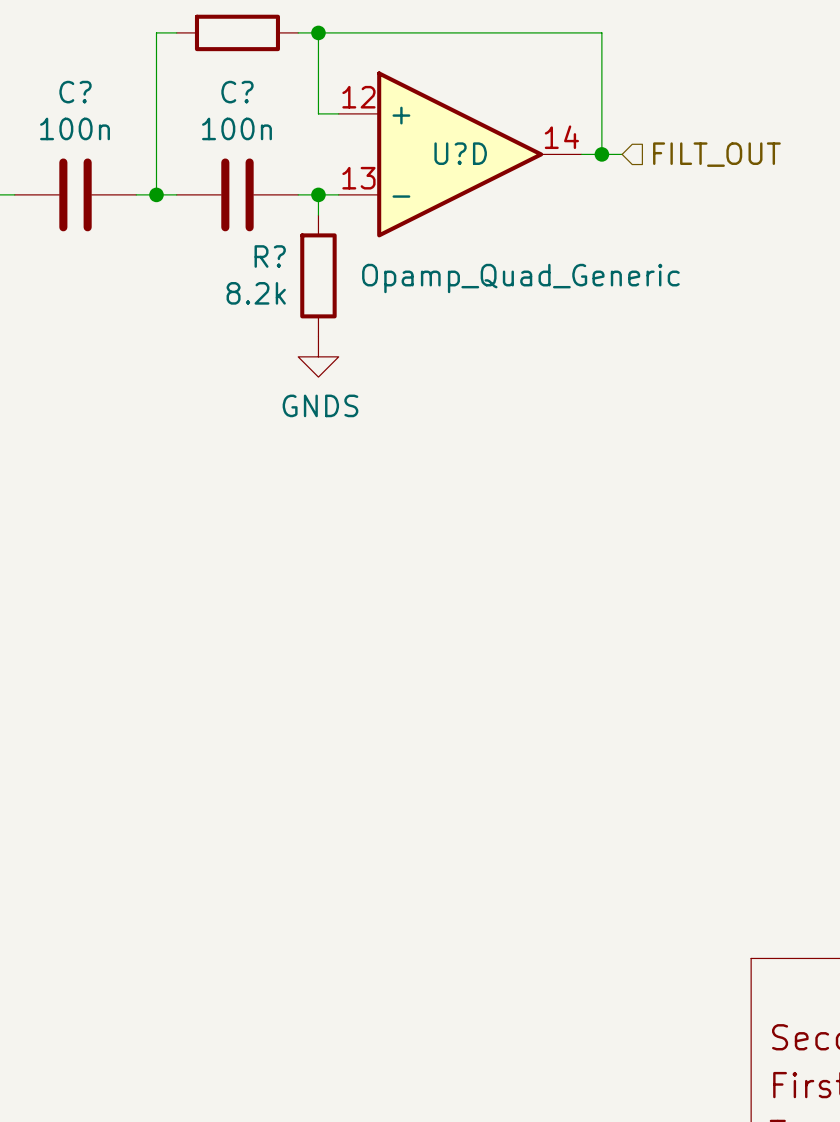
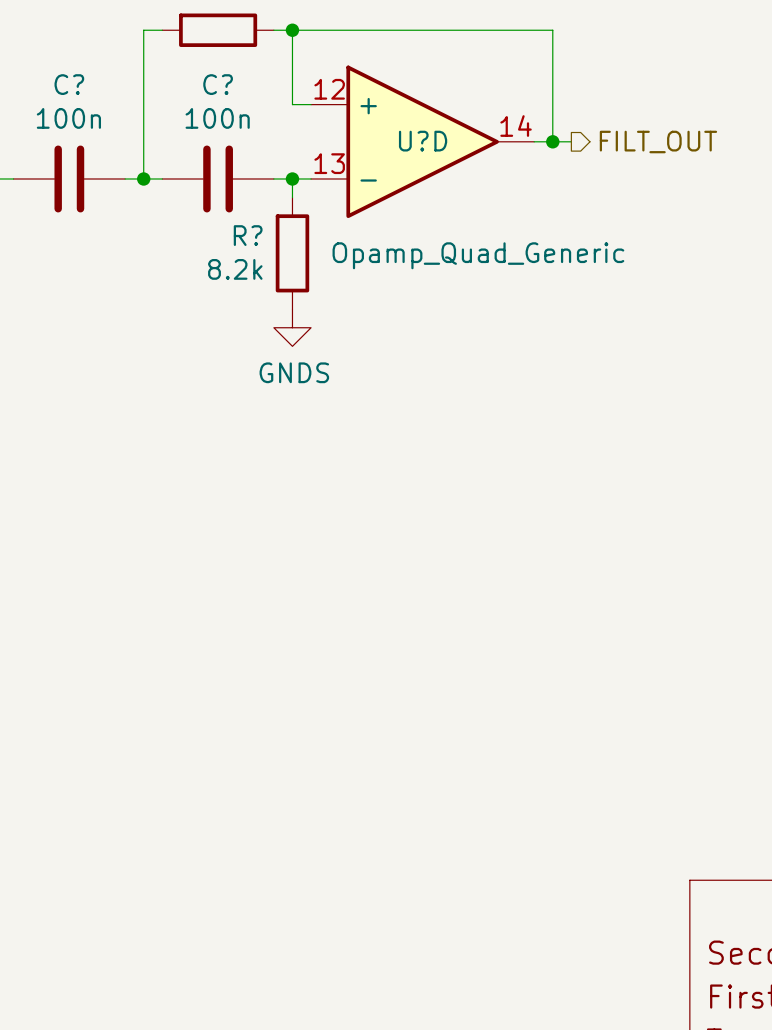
hierarchical label shape: input (716, 154) -> output (658, 142)

